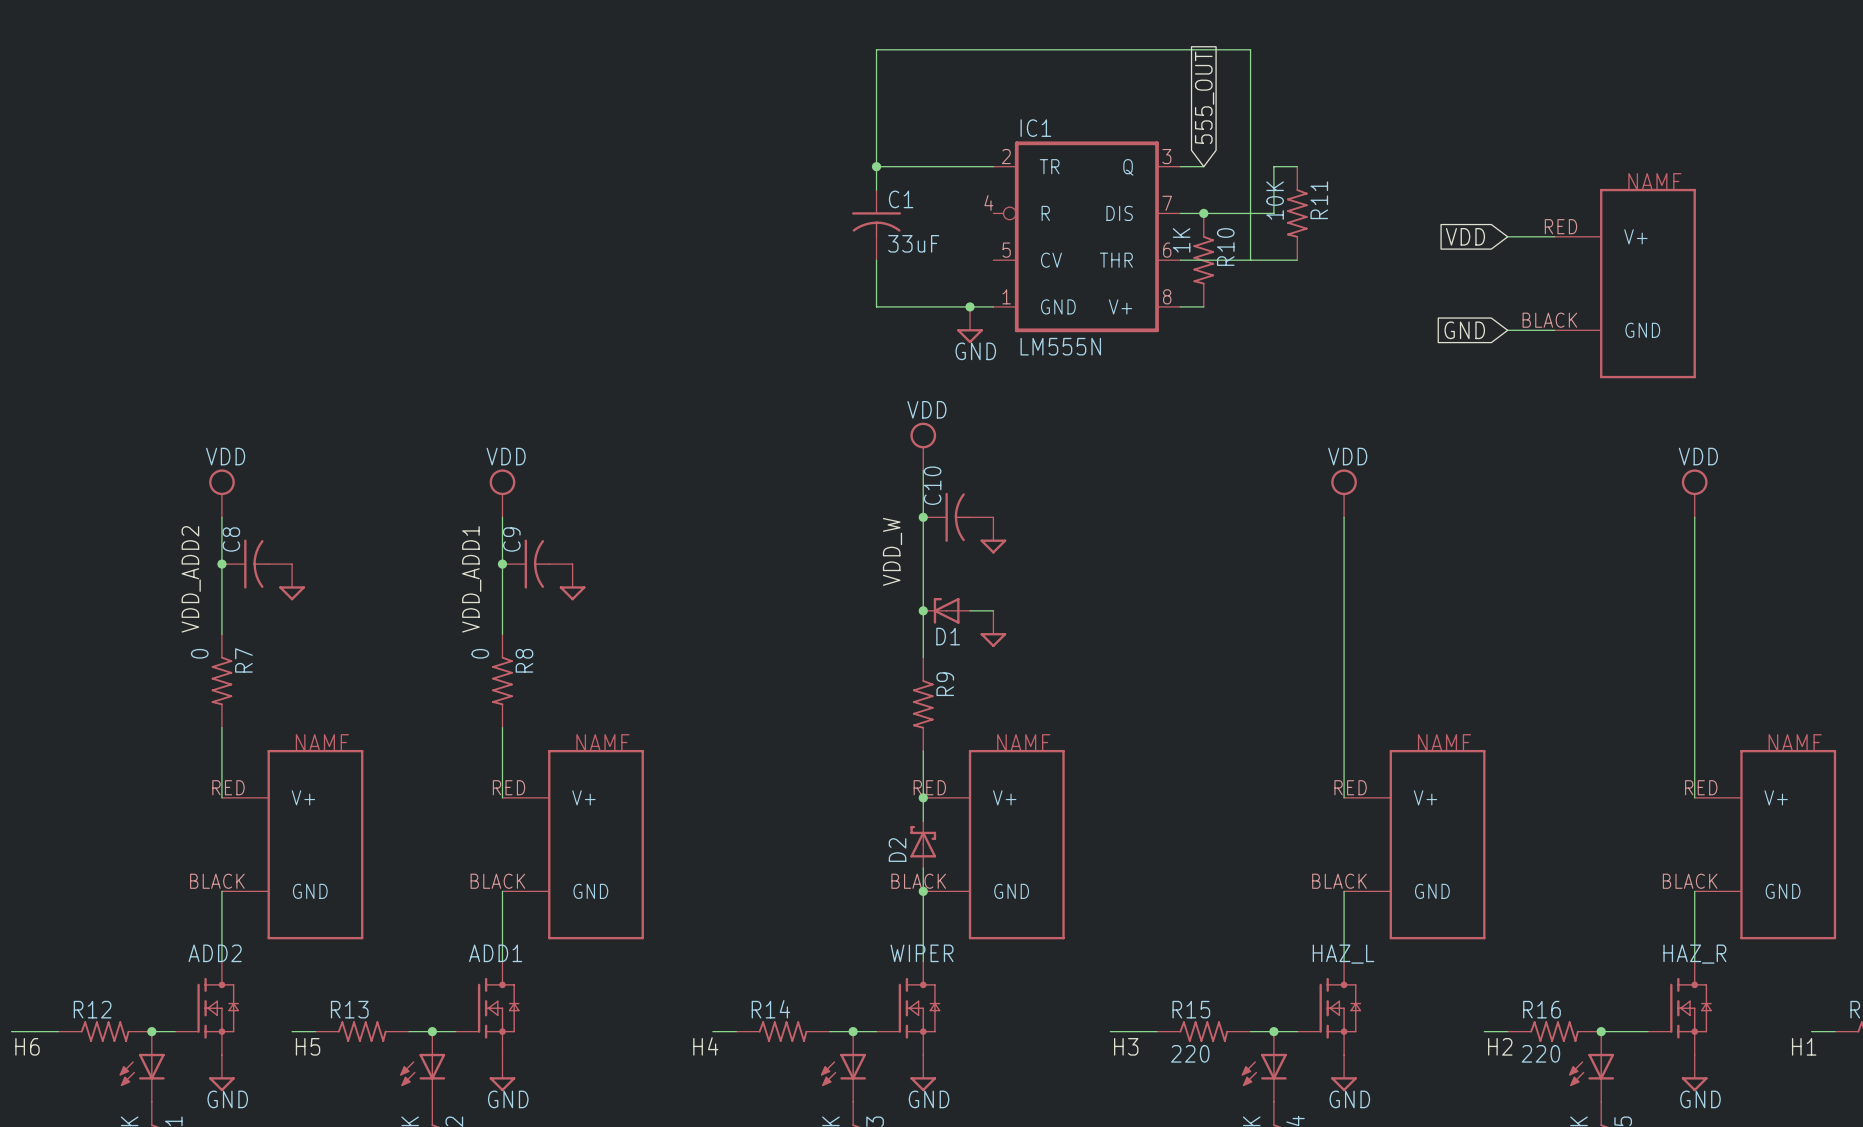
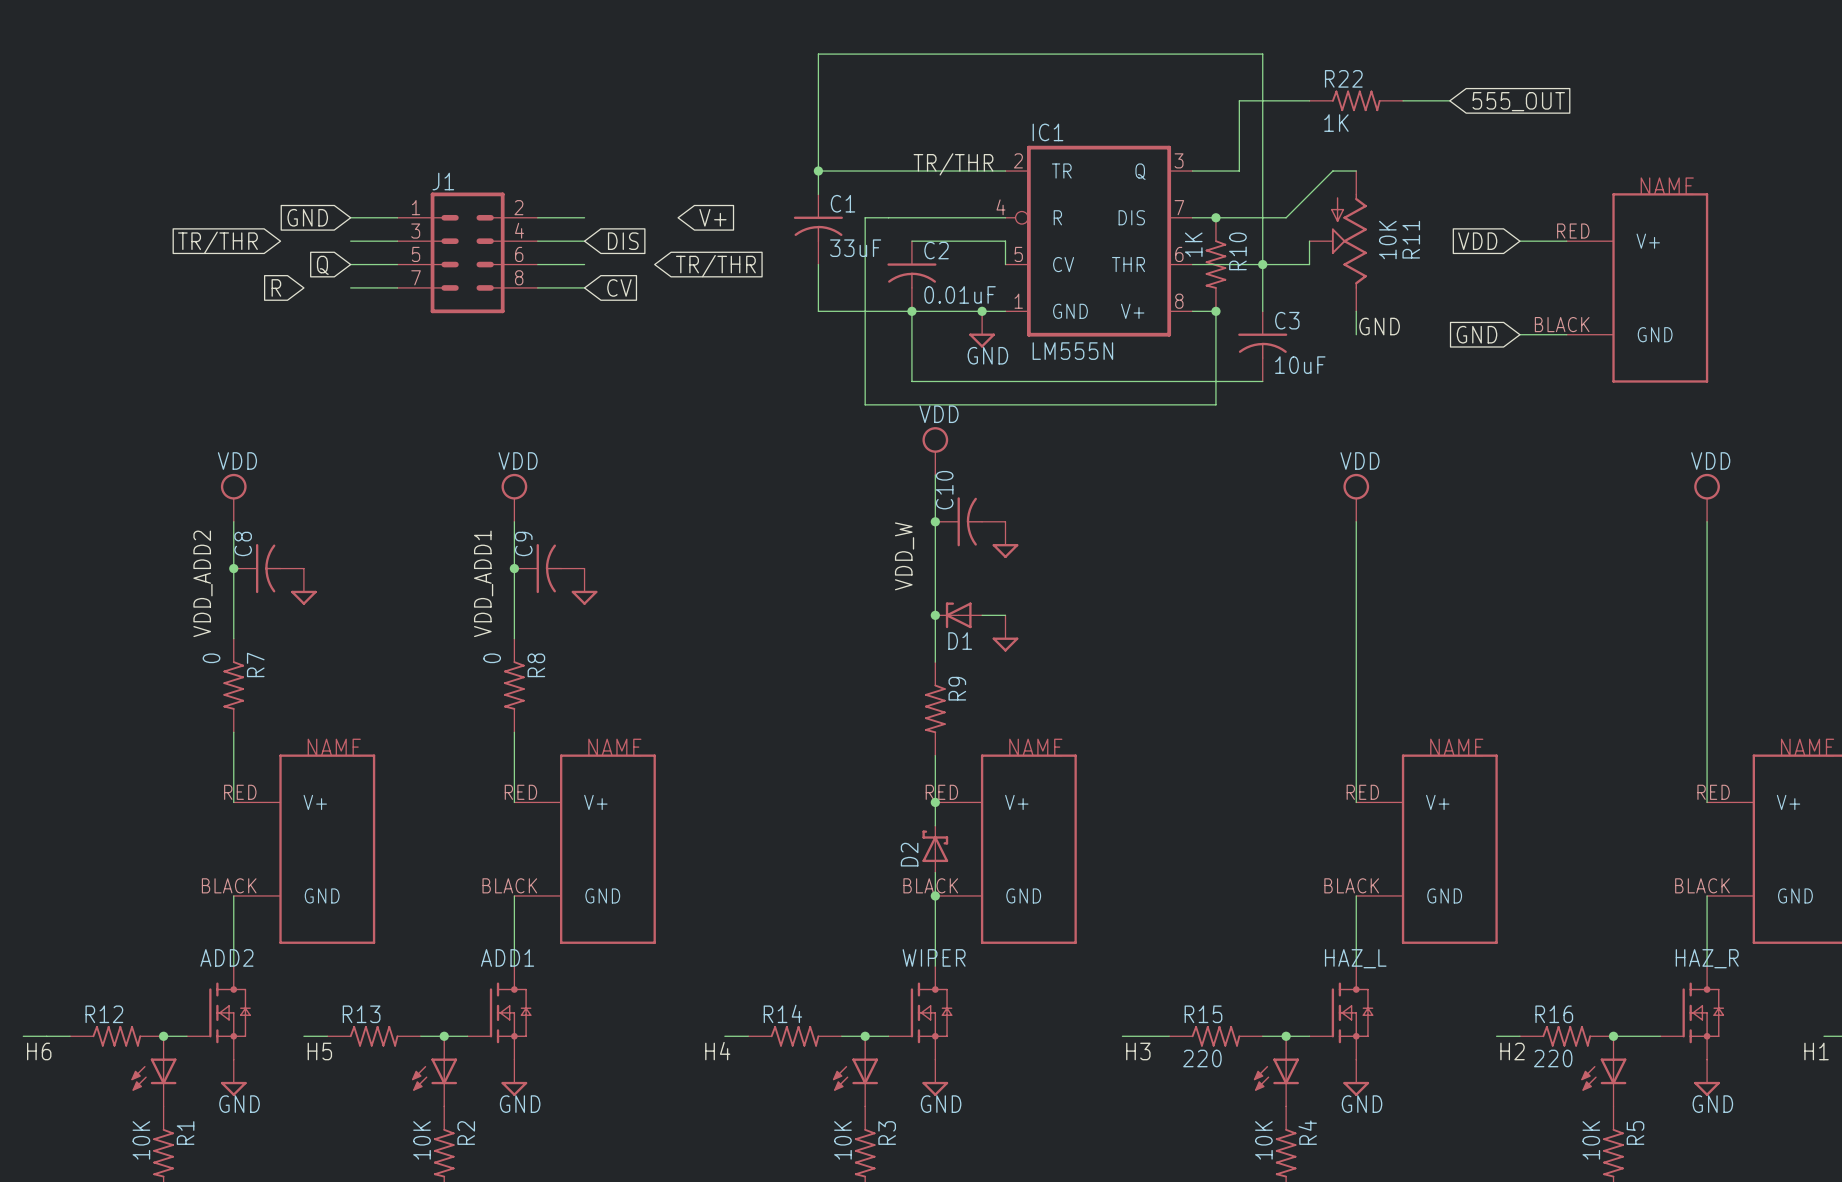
wire: (876, 49) (876, 190) -> (888, 54) (818, 54) (818, 194)
wire: none -> (1309, 100) (1239, 100) (1239, 171) (1215, 171)
R22: none -> 1K (1356, 100)
wire: none -> (1403, 100) (1449, 100)
global label: 555_OUT (1204, 97) -> none
global label: none -> 555_OUT (1518, 101)
label: none -> TR/THR (953, 164)
wire: none -> (818, 171) (888, 171)
junction: none -> (818, 171)
junction: (876, 166) -> none
R11 symbol: [1287, 166, 1308, 261] -> [1309, 171, 1367, 312]
wire: (1297, 166) (1273, 166) (1273, 213) -> (1356, 171) (1332, 171) (1286, 217)
R11 value position: 10K (1275, 200) -> 10K (1387, 240)
R11 name position: R11 (1319, 200) -> R11 (1411, 239)
global label: none -> GND (307, 217)
wire: none -> (350, 217) (397, 217)
wire: none -> (537, 217) (584, 217)
global label: none -> V+ (712, 217)
wire: none -> (1005, 217) (865, 217) (865, 404) (1215, 404) (1215, 311)
C1 position: (876, 225) -> (818, 229)
wire: none -> (350, 241) (397, 241)
wire: none -> (537, 241) (584, 241)
global label: none -> DIS (623, 241)
wire: none -> (911, 241) (1005, 241) (1005, 264)
global label: none -> TR/THR (217, 242)
J1: none -> (467, 252)
global label: none -> Q (322, 265)
wire: none -> (350, 264) (397, 264)
wire: none -> (537, 264) (584, 264)
wire: (876, 260) (876, 306) -> (818, 264) (818, 311) (888, 311)
wire: none -> (1262, 264) (1262, 311)
junction: none -> (1262, 264)
global label: none -> TR/THR (715, 266)
C2: none -> 0.01uF (911, 276)
global label: none -> R (276, 287)
wire: none -> (350, 287) (397, 287)
wire: none -> (537, 287) (584, 287)
global label: none -> CV (619, 287)
wire: none -> (911, 311) (911, 381) (1262, 381)
junction: none -> (911, 311)
junction: none -> (1215, 311)
wire: none -> (1356, 311) (1356, 334)
label: none -> GND (1379, 326)
C3: none -> 10uF (1262, 346)

